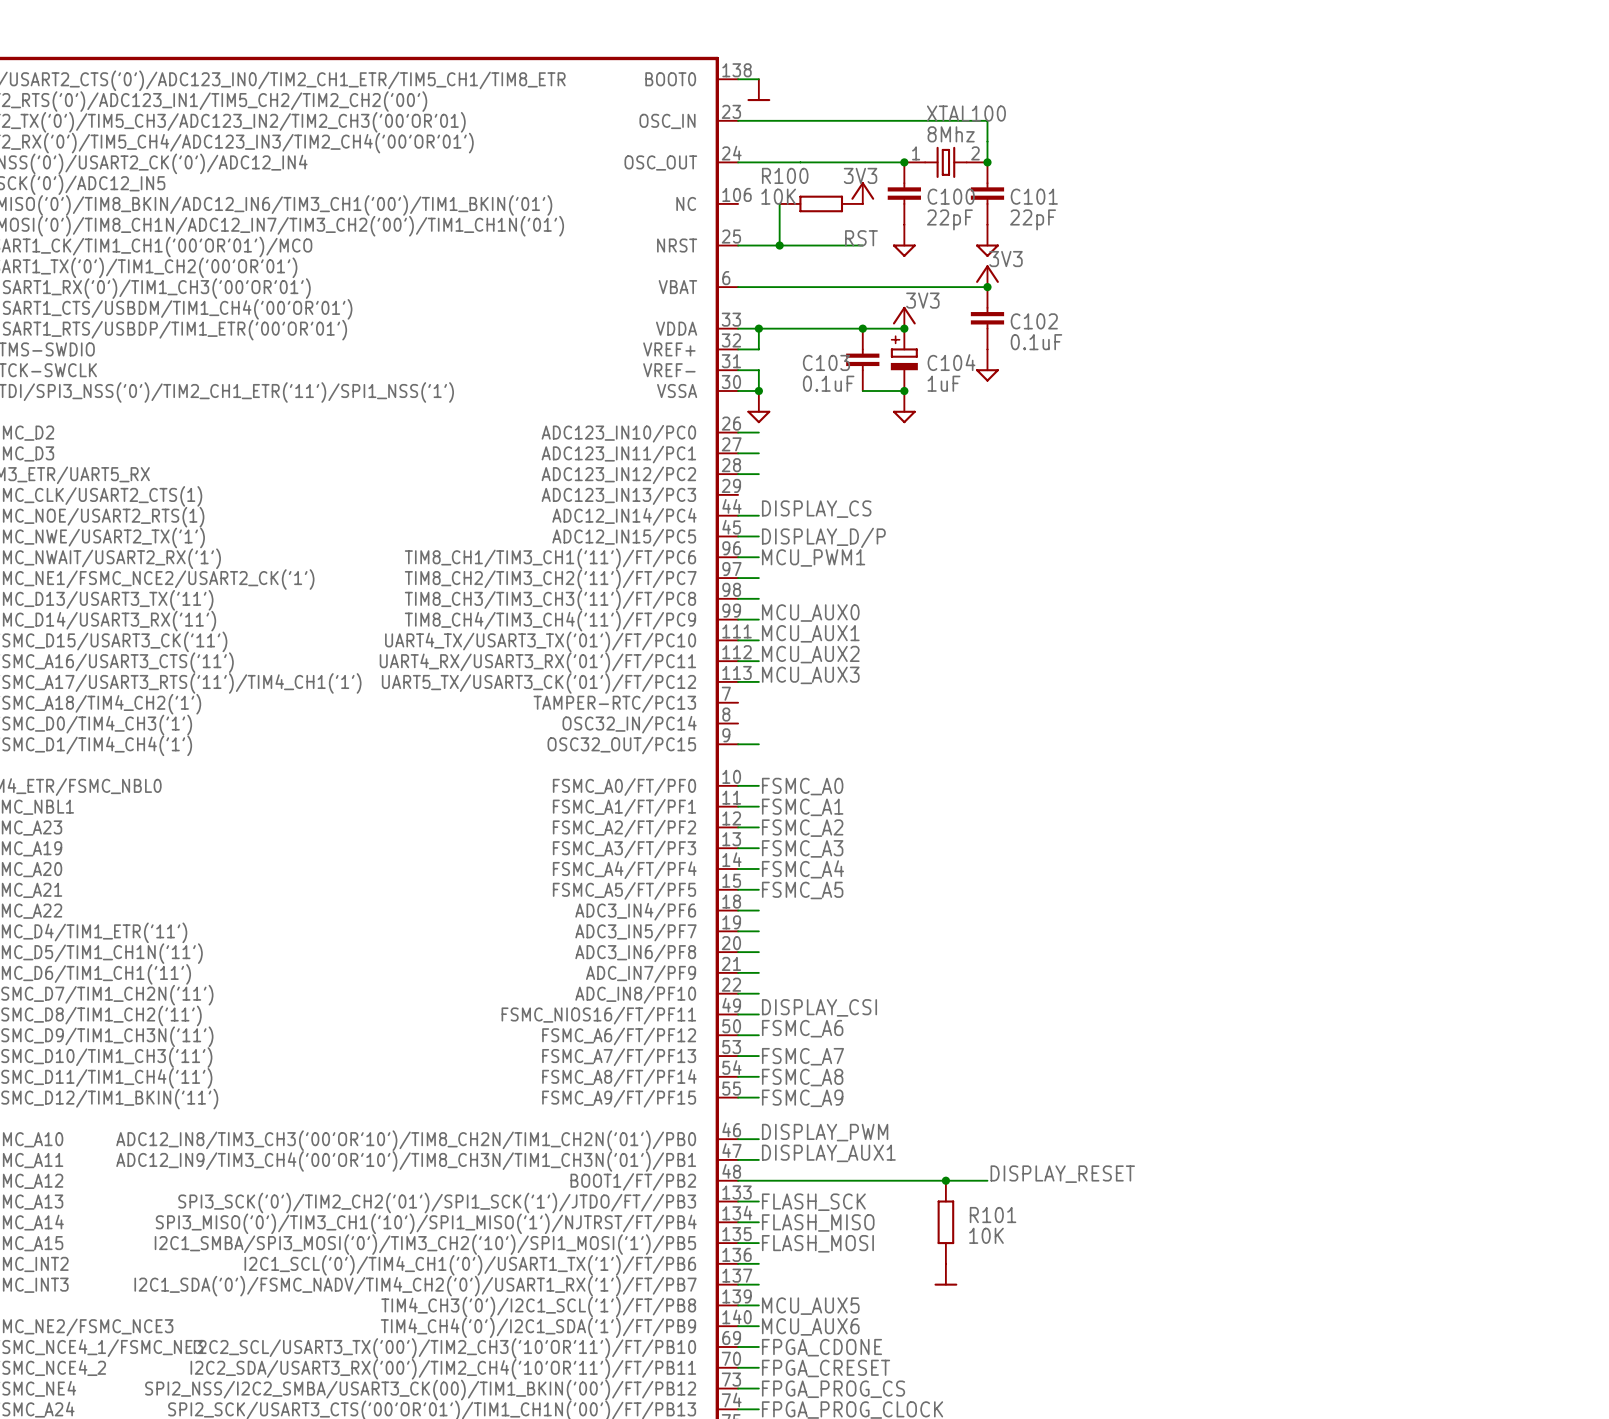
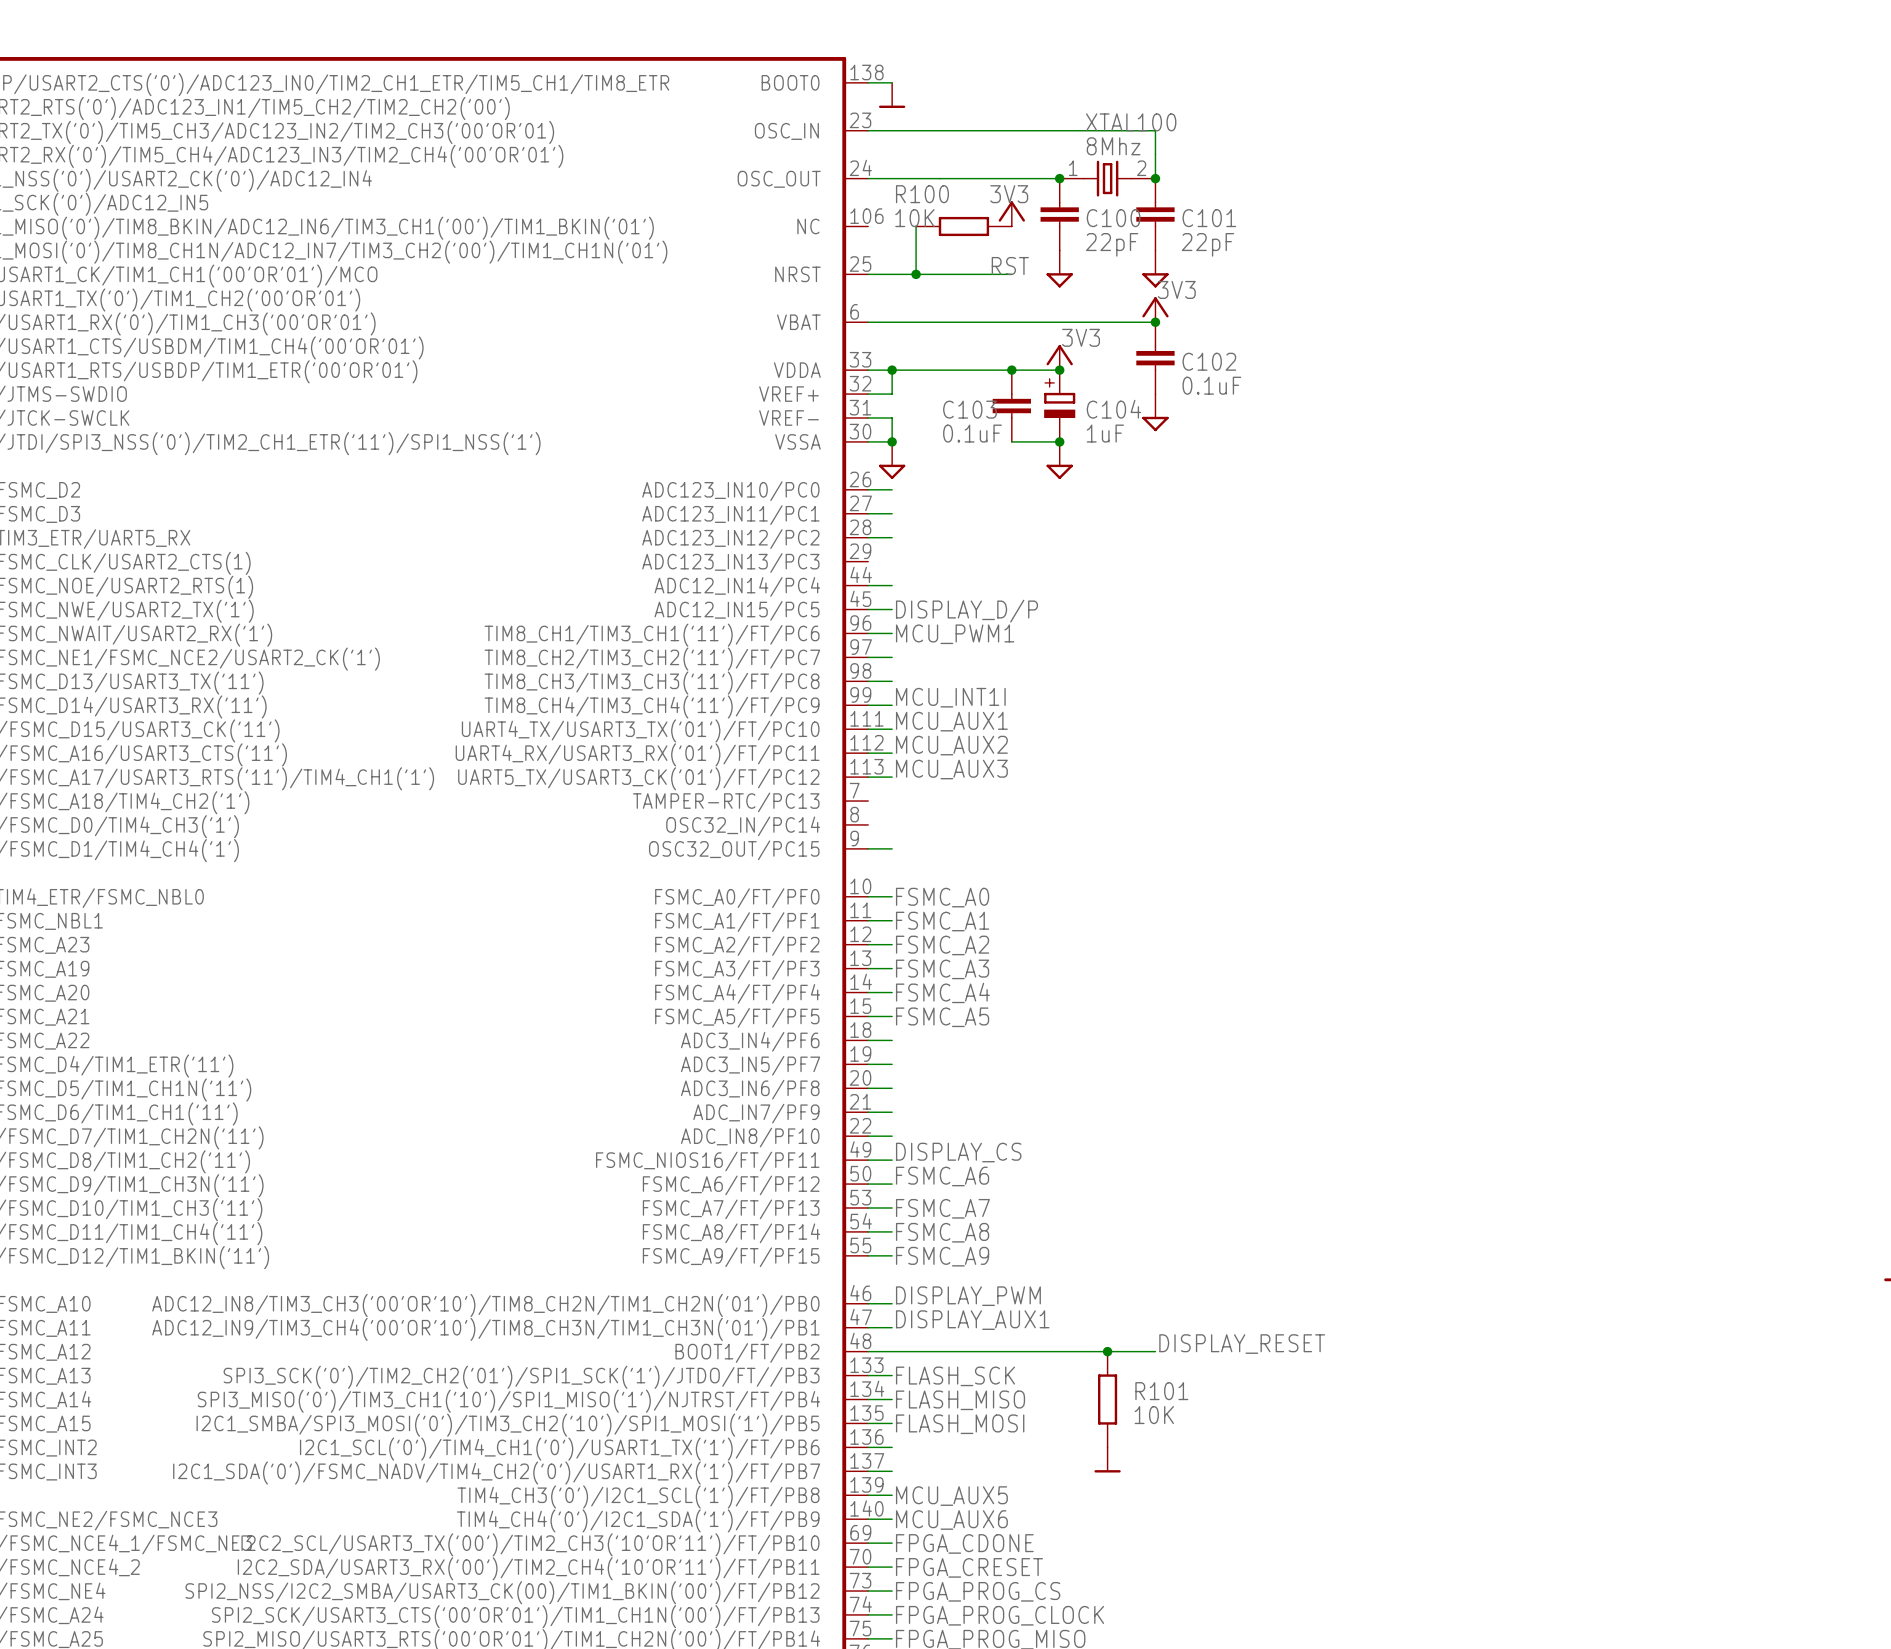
label: DISPLAY_CS (816, 509) -> none
label: MCU_AUX0 (810, 613) -> MCU_INT1I (950, 697)
label: DISPLAY_CSI (819, 1007) -> DISPLAY_CS (958, 1152)

